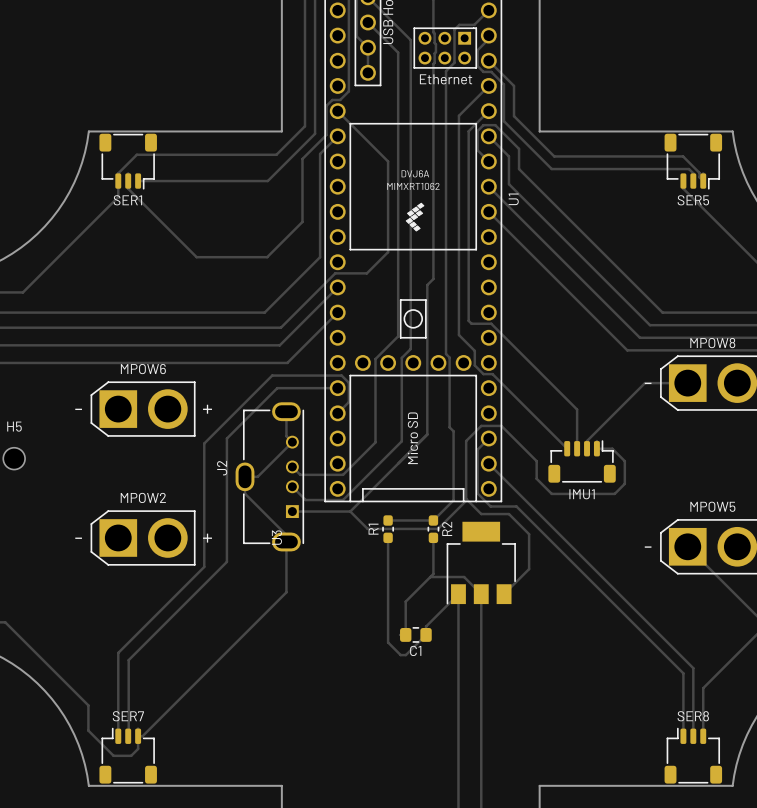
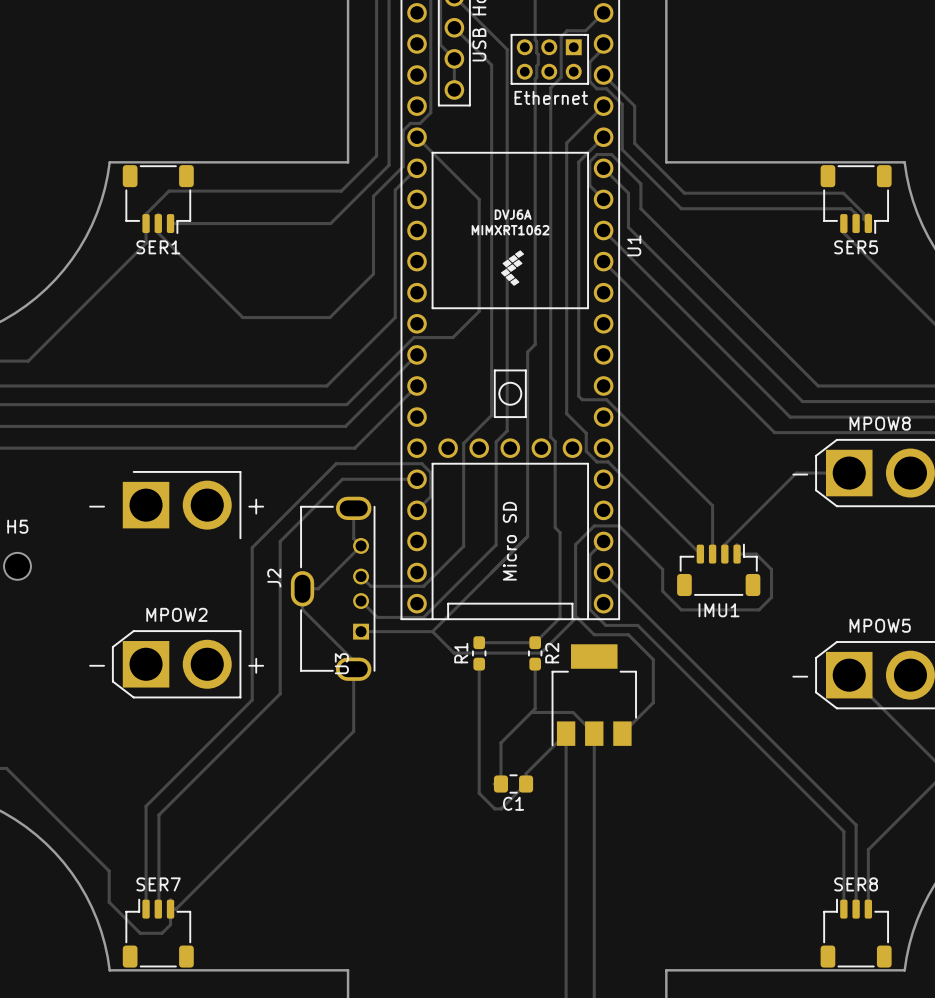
MPOW6: (143, 409) -> none
part: none -> (181, 505)

